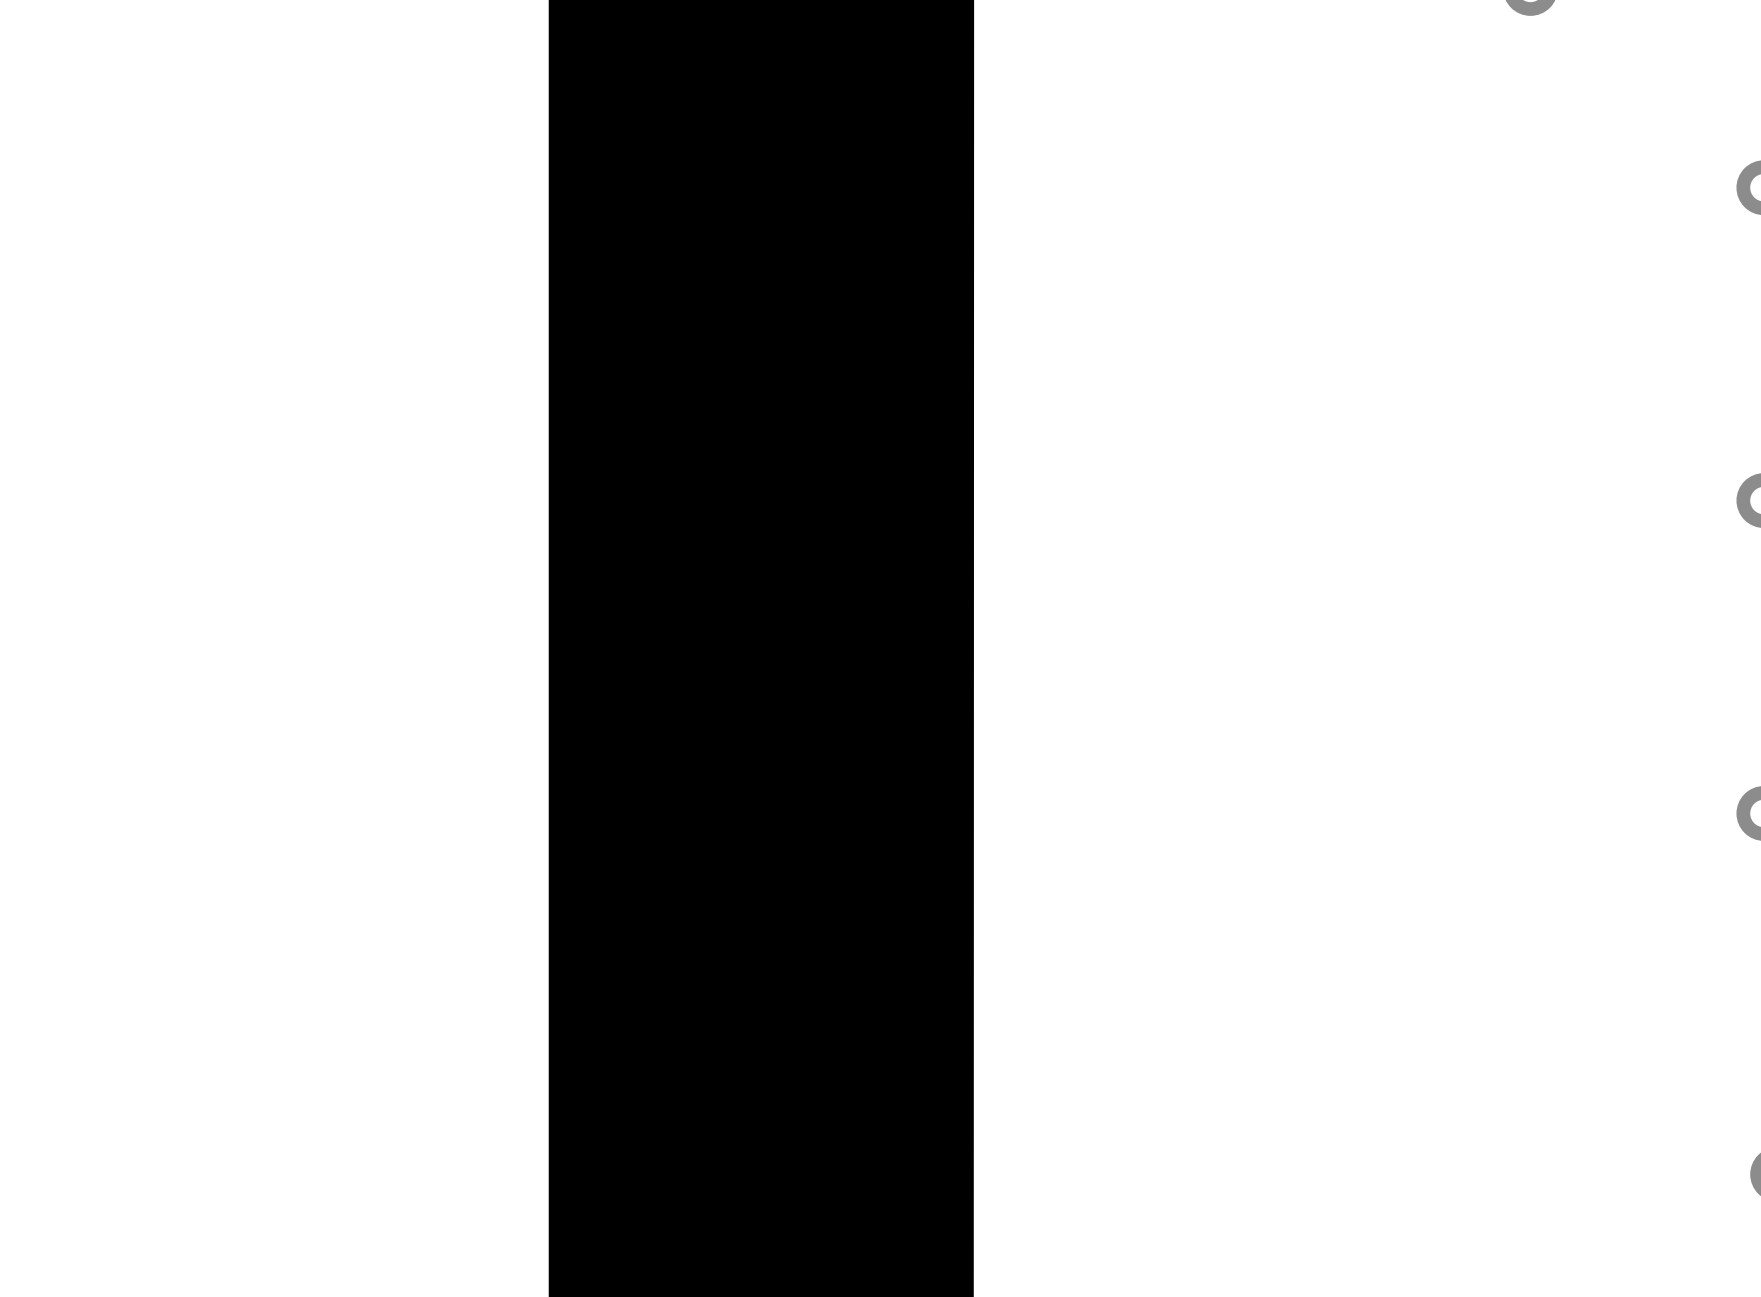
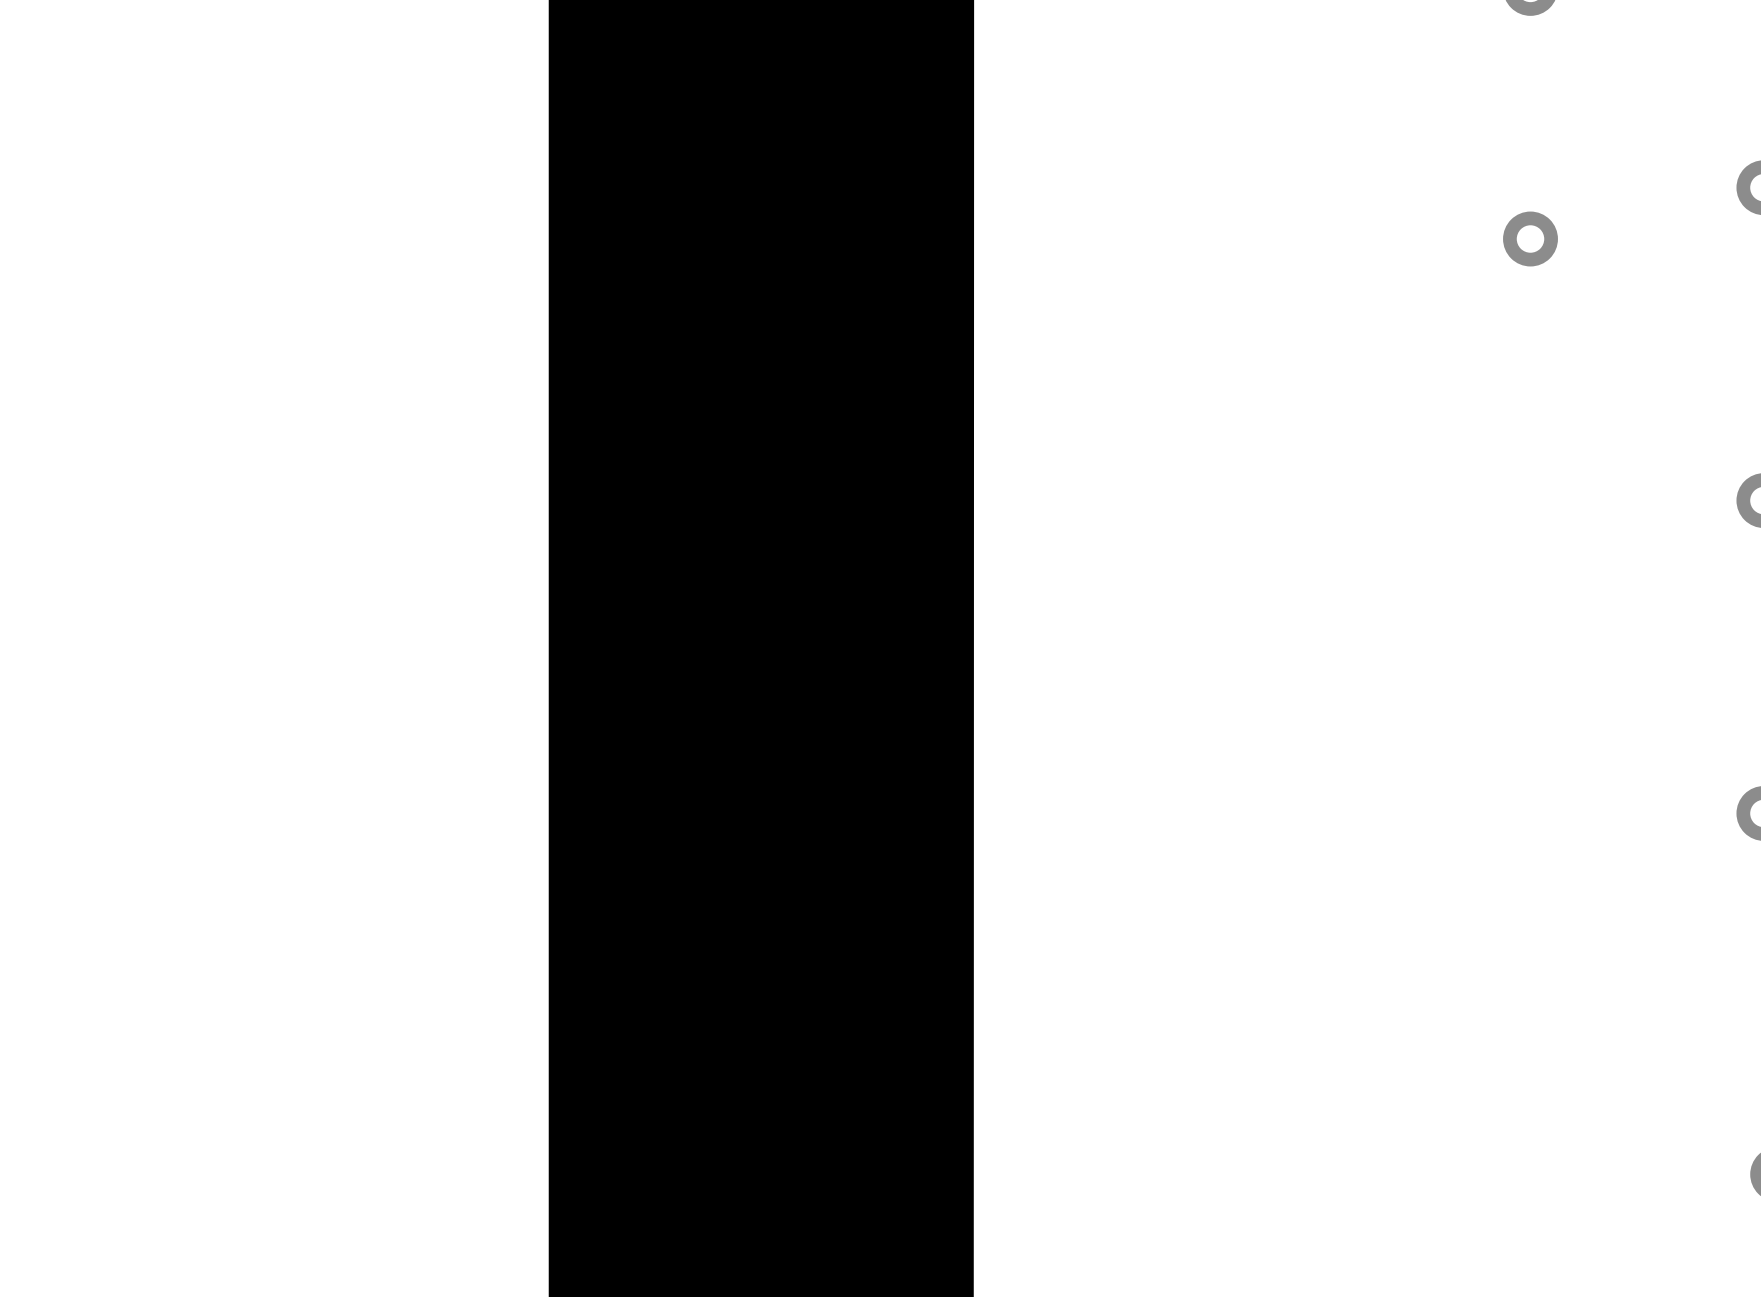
via: none -> (1530, 239)

